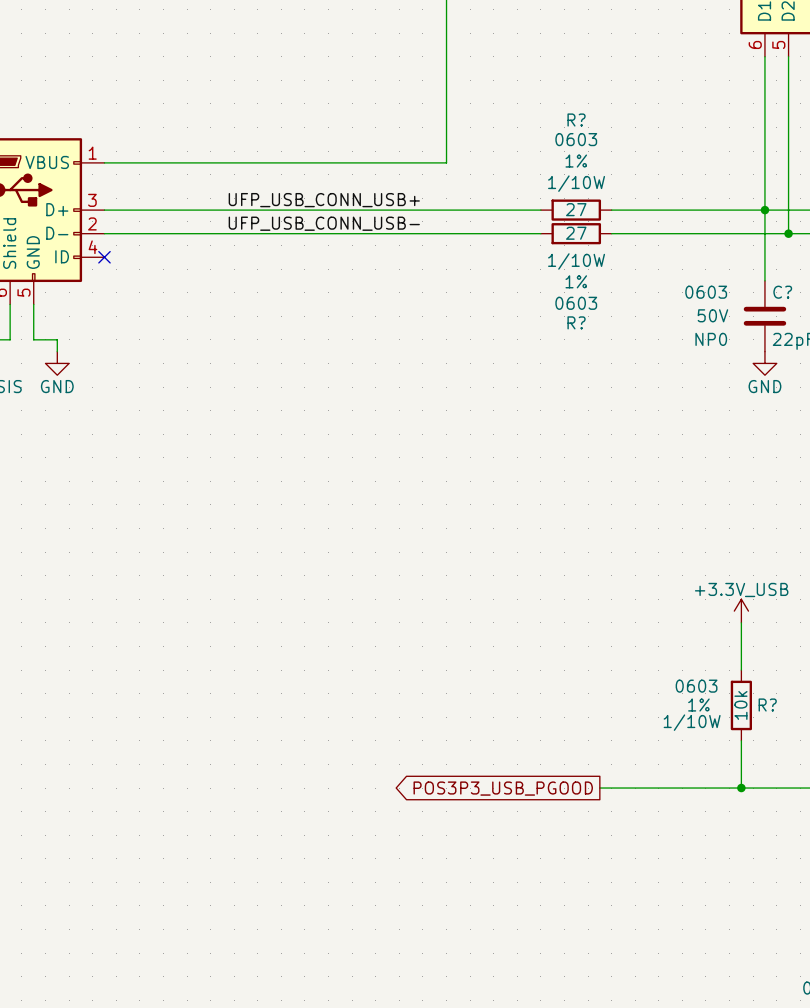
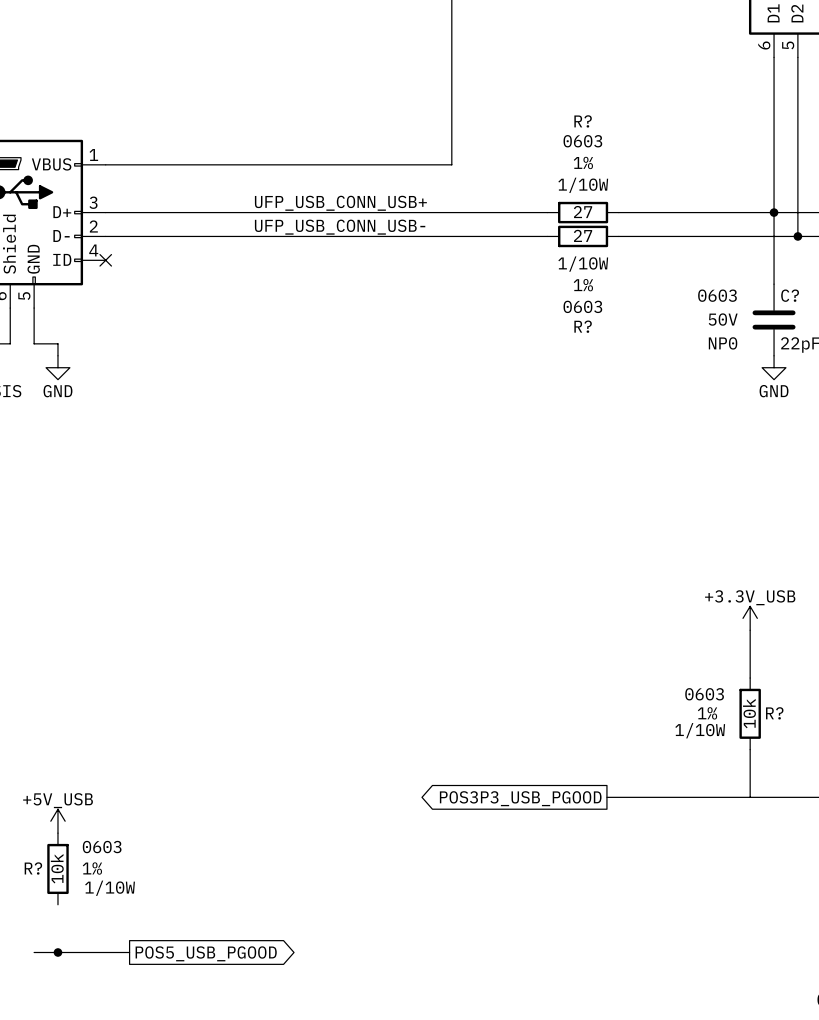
junction: (741, 788) -> none
power symbol: none -> +5V_USB (57, 821)
R?: none -> 10k (57, 868)
wire: none -> (34, 952) (129, 952)
junction: none -> (57, 952)
global label: none -> POS5_USB_PGOOD (206, 953)

